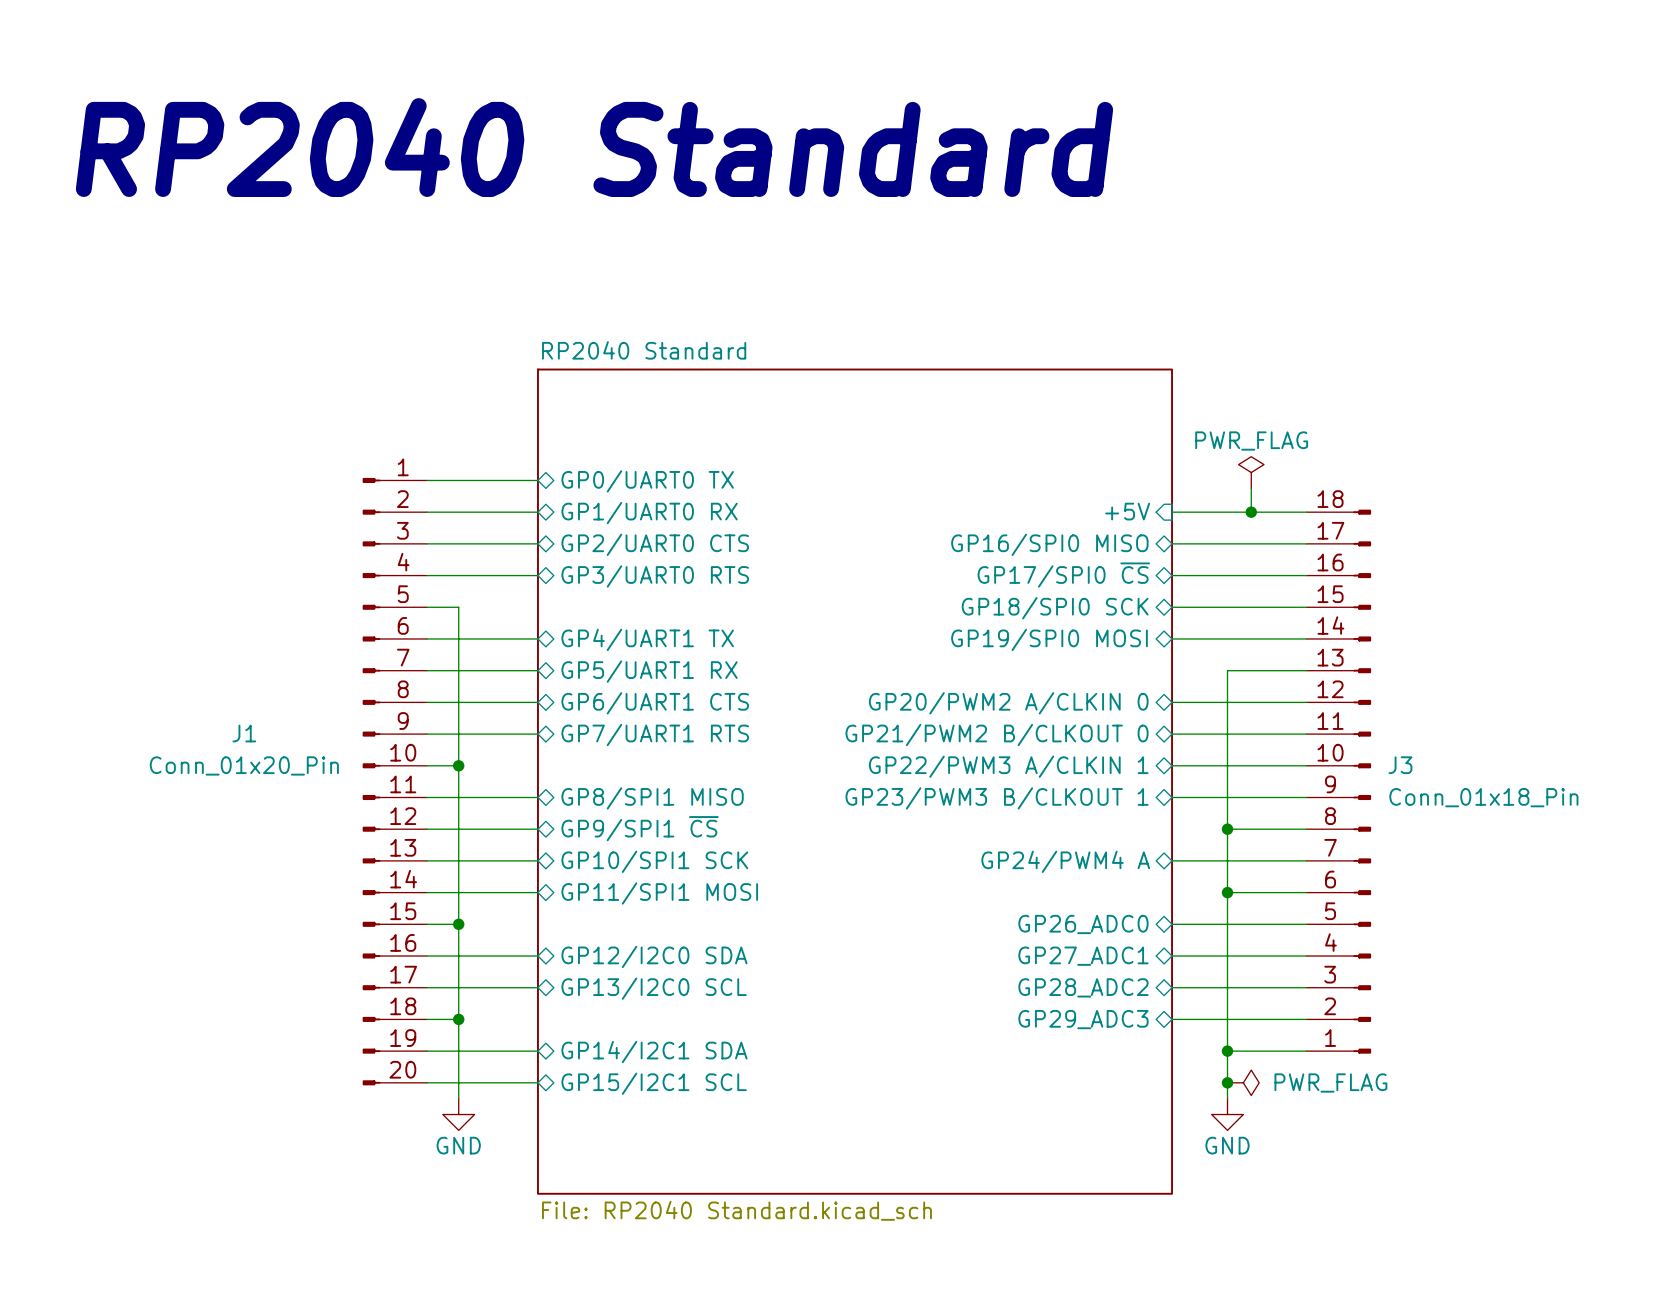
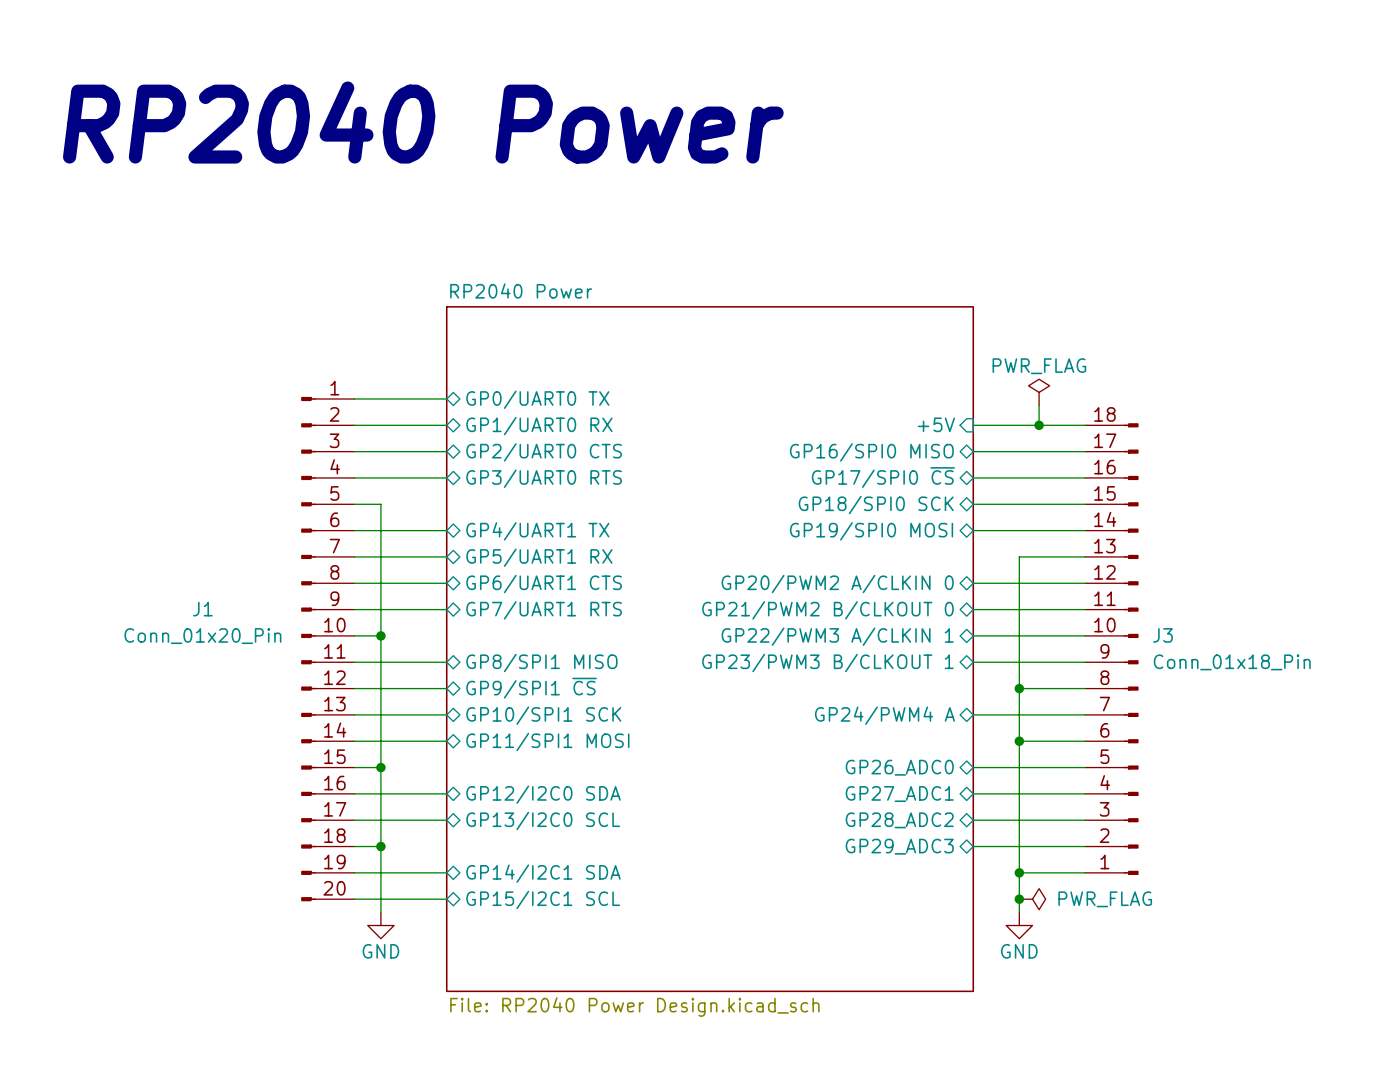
text: RP2040 Standard (594, 147) -> RP2040 Power (423, 122)
sheet RP2040 Standard name: RP2040 Standard (644, 350) -> RP2040 Power (521, 290)
sheet RP2040 Standard value: File: RP2040 Standard.kicad_sch (736, 1210) -> File: RP2040 Power Design.kicad_sch (634, 1007)

